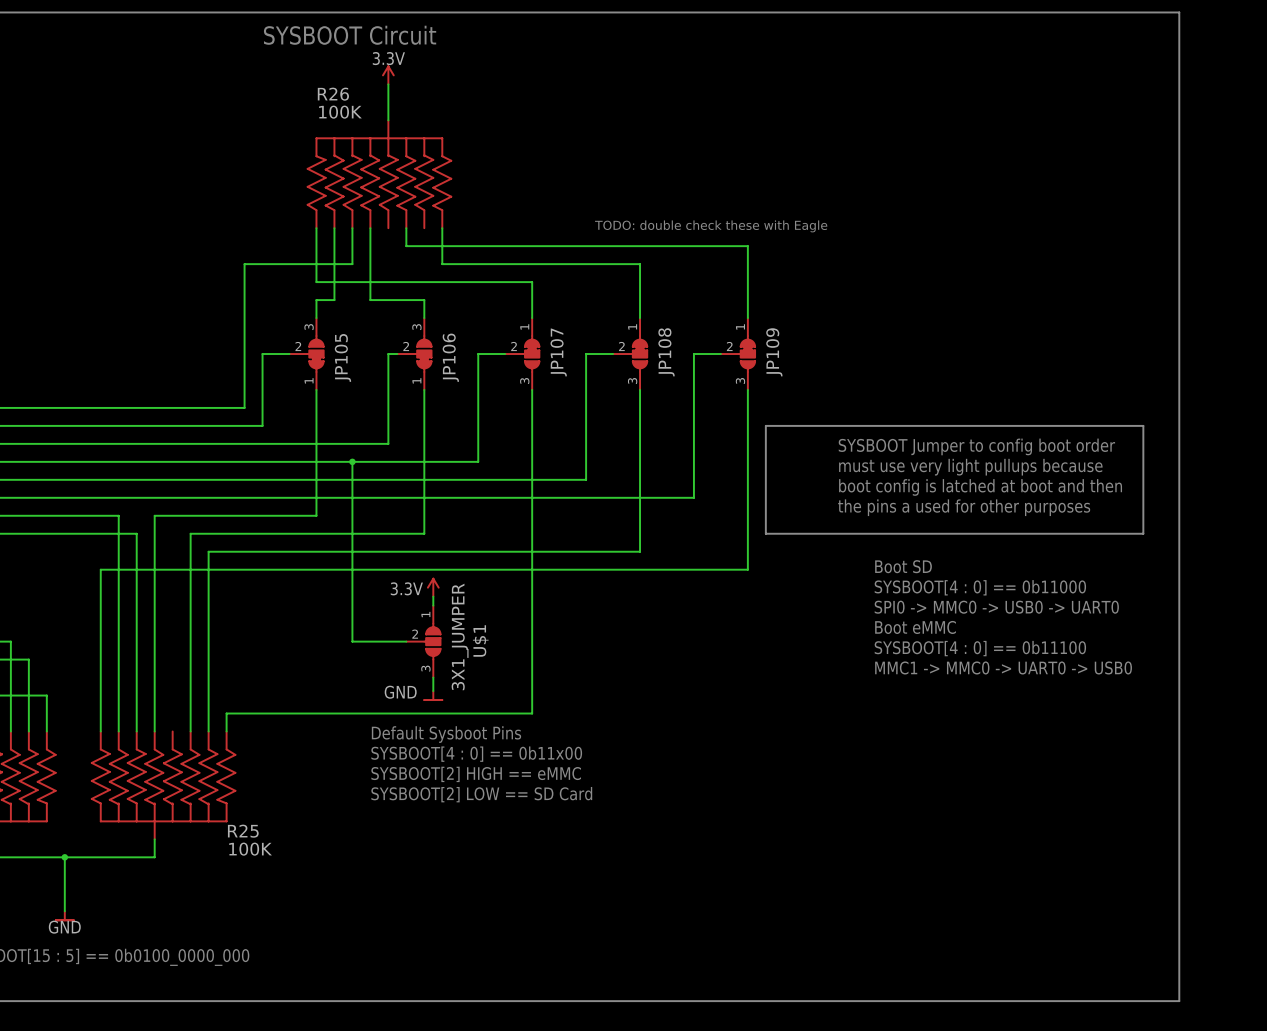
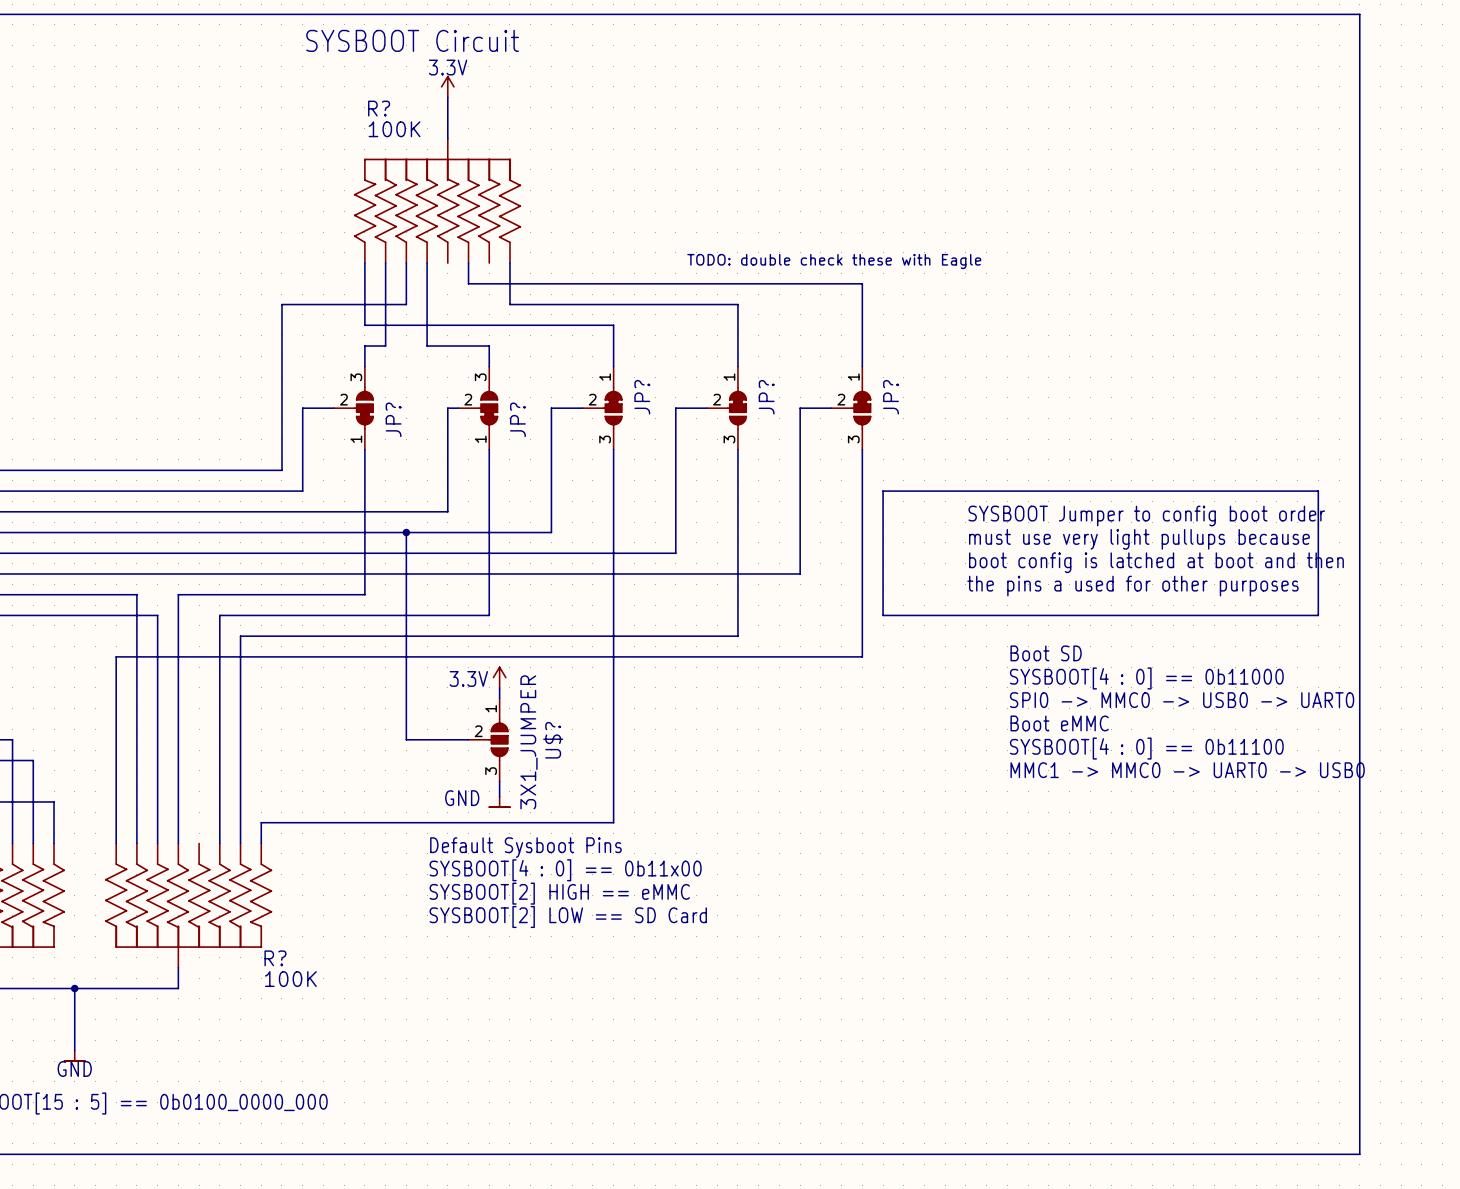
R26 name: R26 (333, 94) -> R? (379, 108)
JP107 name: JP107 (558, 352) -> JP? (642, 397)
JP108 name: JP108 (666, 352) -> JP? (766, 397)
JP109 name: JP109 (774, 352) -> JP? (891, 397)
JP105 name: JP105 (342, 357) -> JP? (393, 419)
JP106 name: JP106 (450, 357) -> JP? (517, 419)
U$1 name: U$1 (480, 640) -> U$? (553, 740)
R25 name: R25 (243, 831) -> R? (275, 958)

